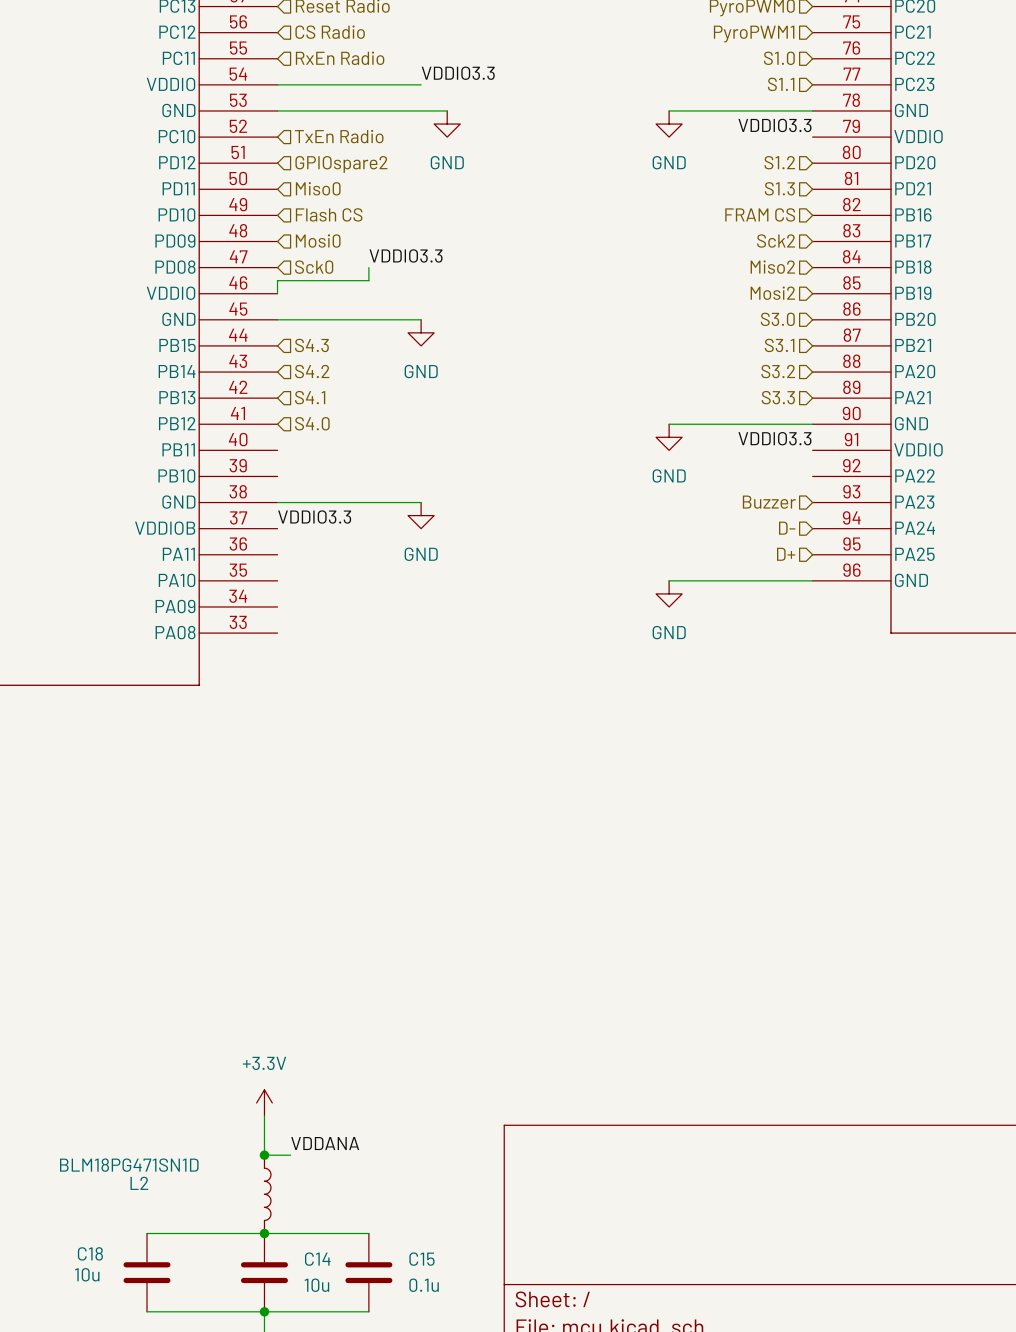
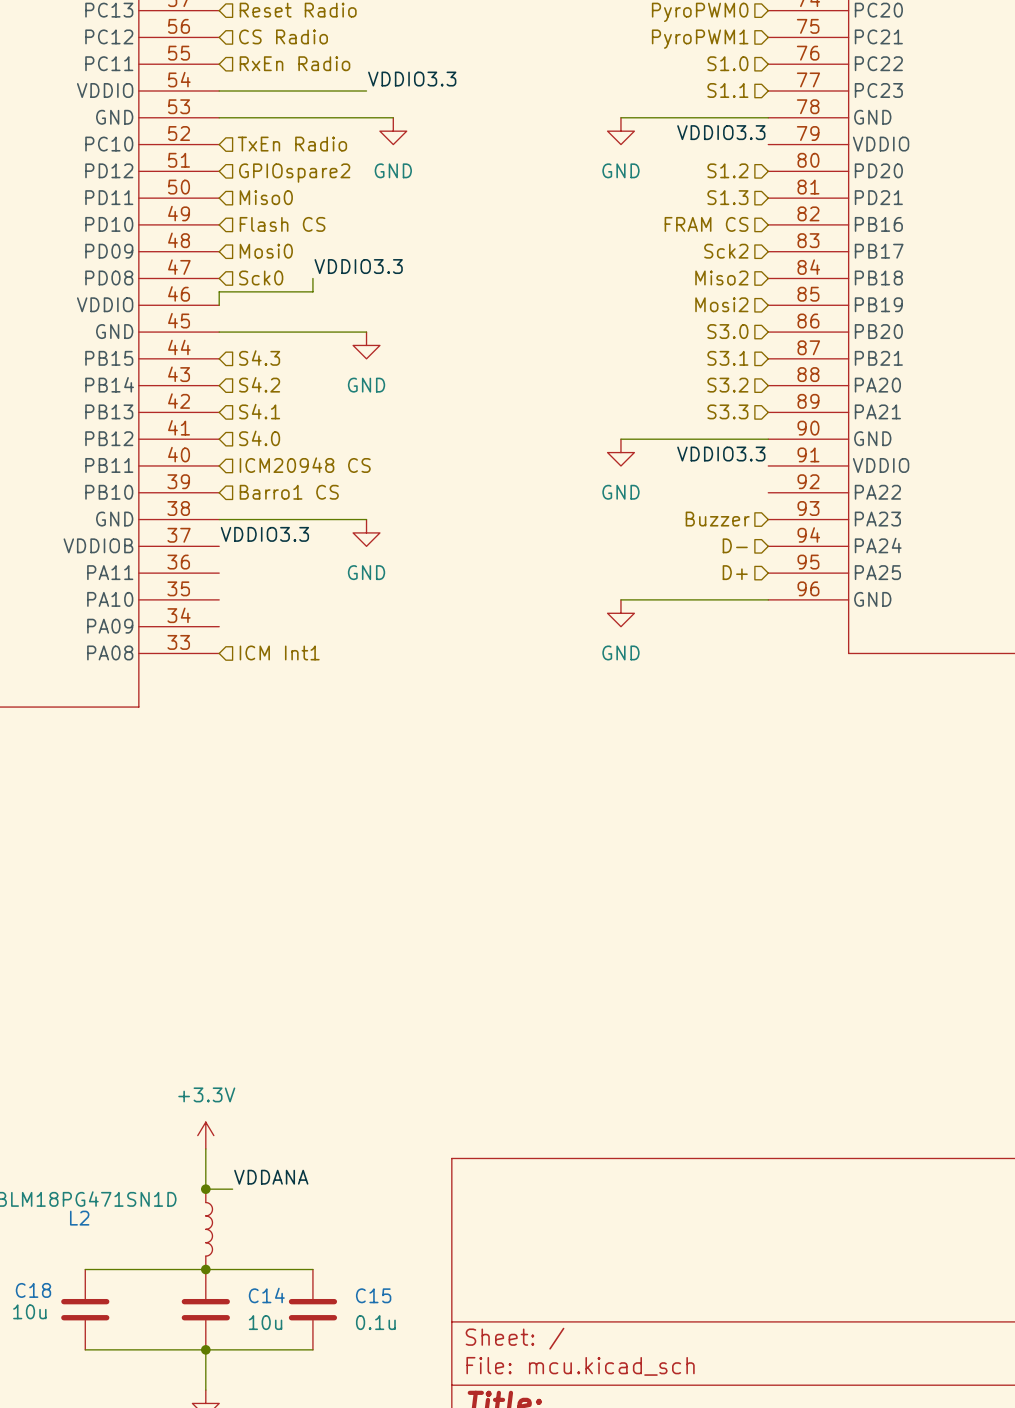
hierarchical label: none -> ICM20948 CS (305, 465)
hierarchical label: none -> Barro1 CS (289, 492)
hierarchical label: none -> ICM Int1 (279, 652)

